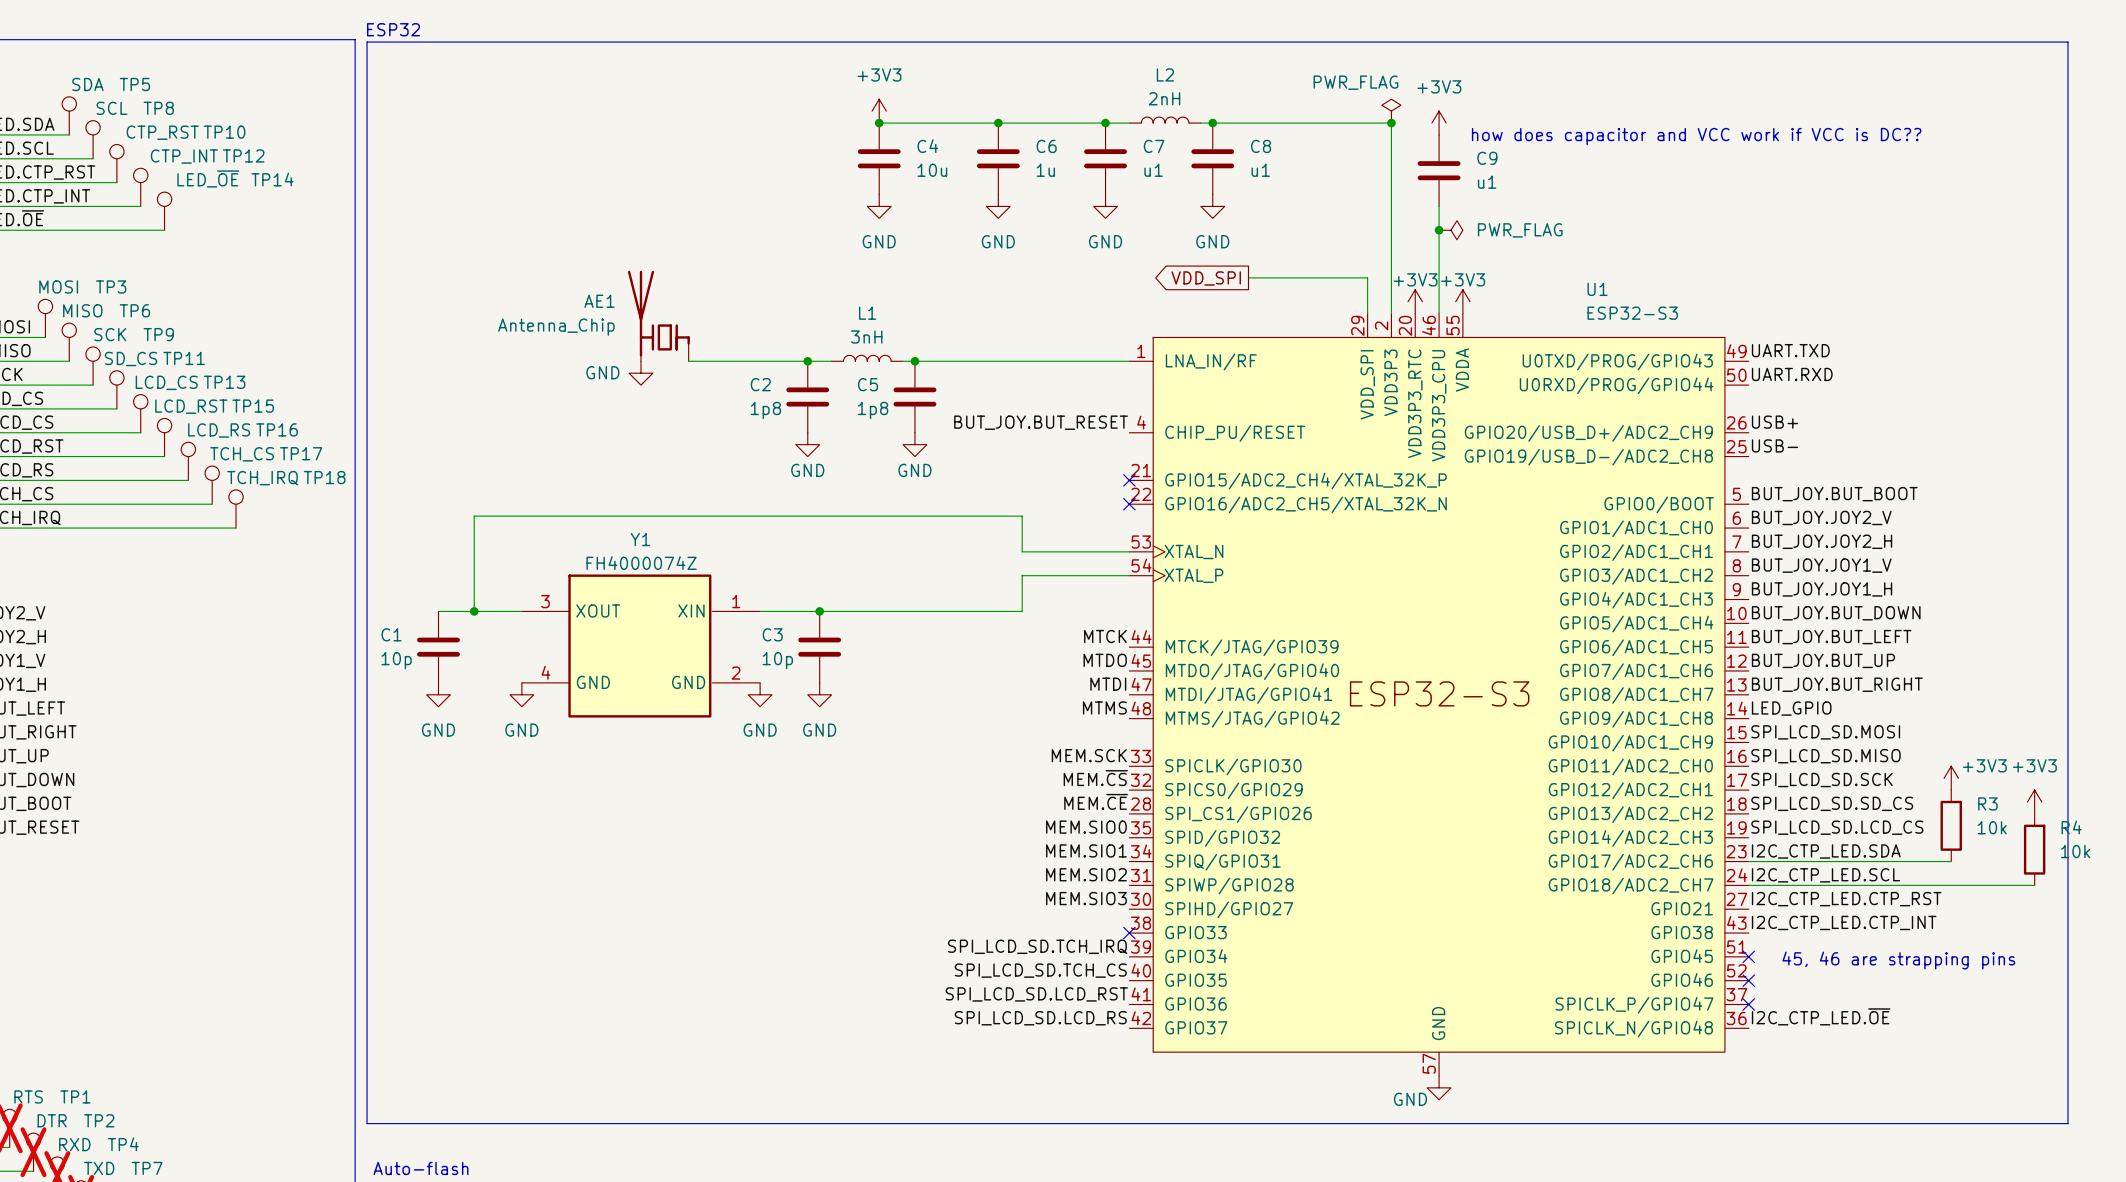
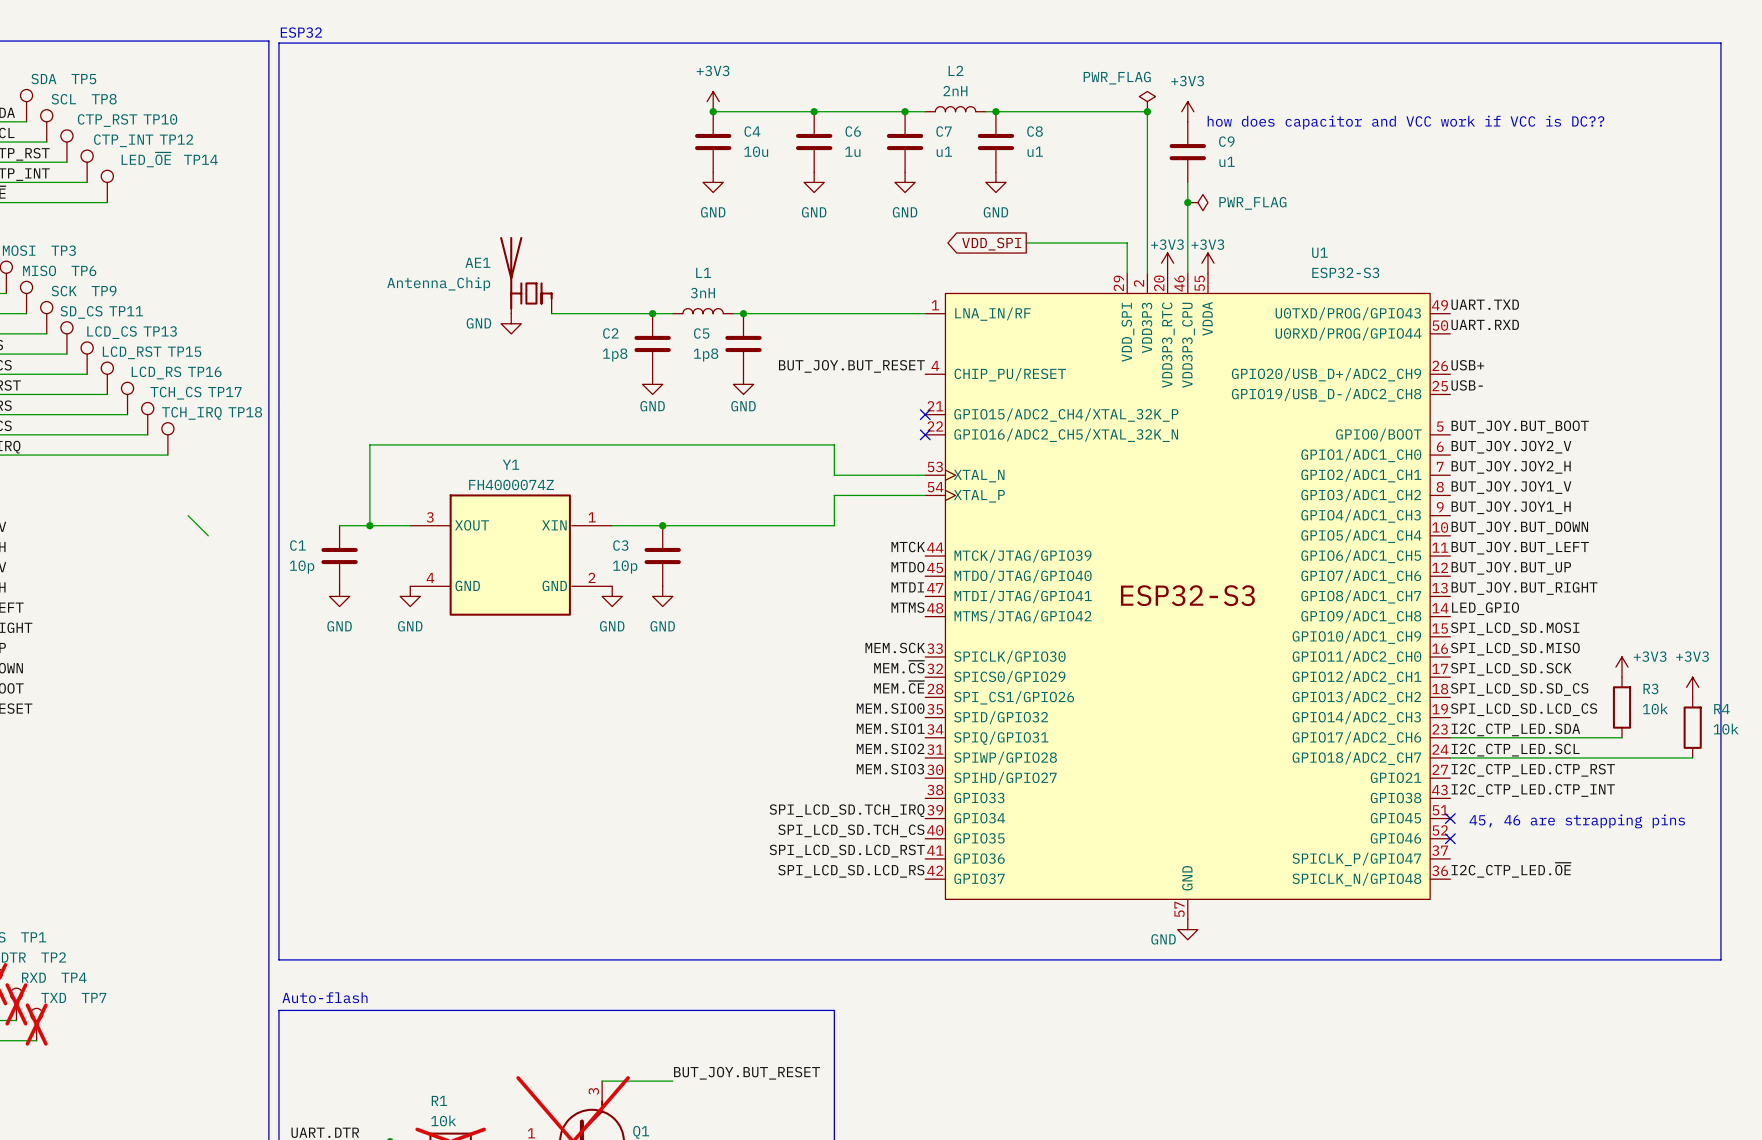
wire: none -> (188, 515) (208, 535)
no-connect mark: (1129, 933) -> none
no-connect mark: (1748, 1004) -> none

